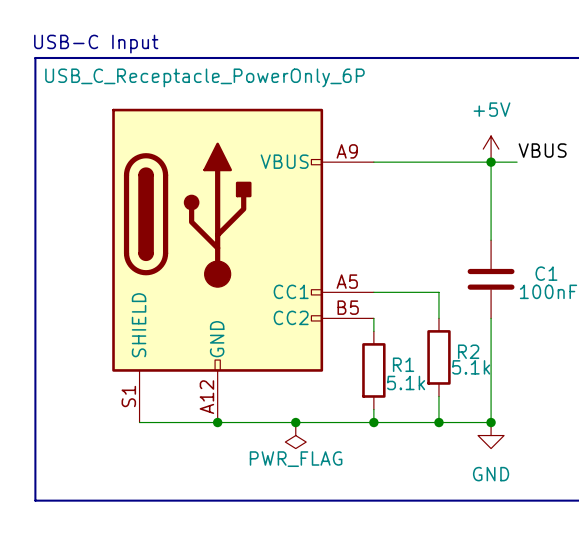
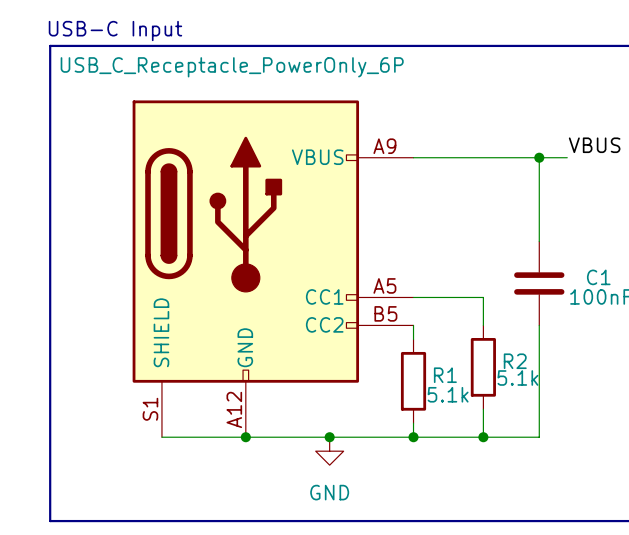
power symbol: +5V (491, 149) -> none
junction: (491, 422) -> none
power symbol: PWR_FLAG (295, 435) -> GND (329, 451)
power symbol: GND (491, 435) -> none

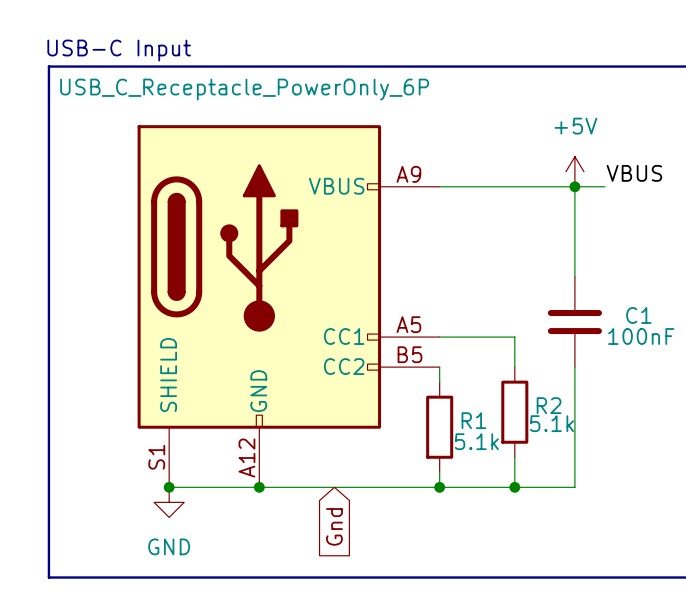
power symbol: none -> +5V (574, 171)
junction: none -> (169, 487)
junction: (329, 437) -> none
power symbol position: GND (329, 451) -> GND (169, 502)
global label: none -> Gnd (334, 526)

